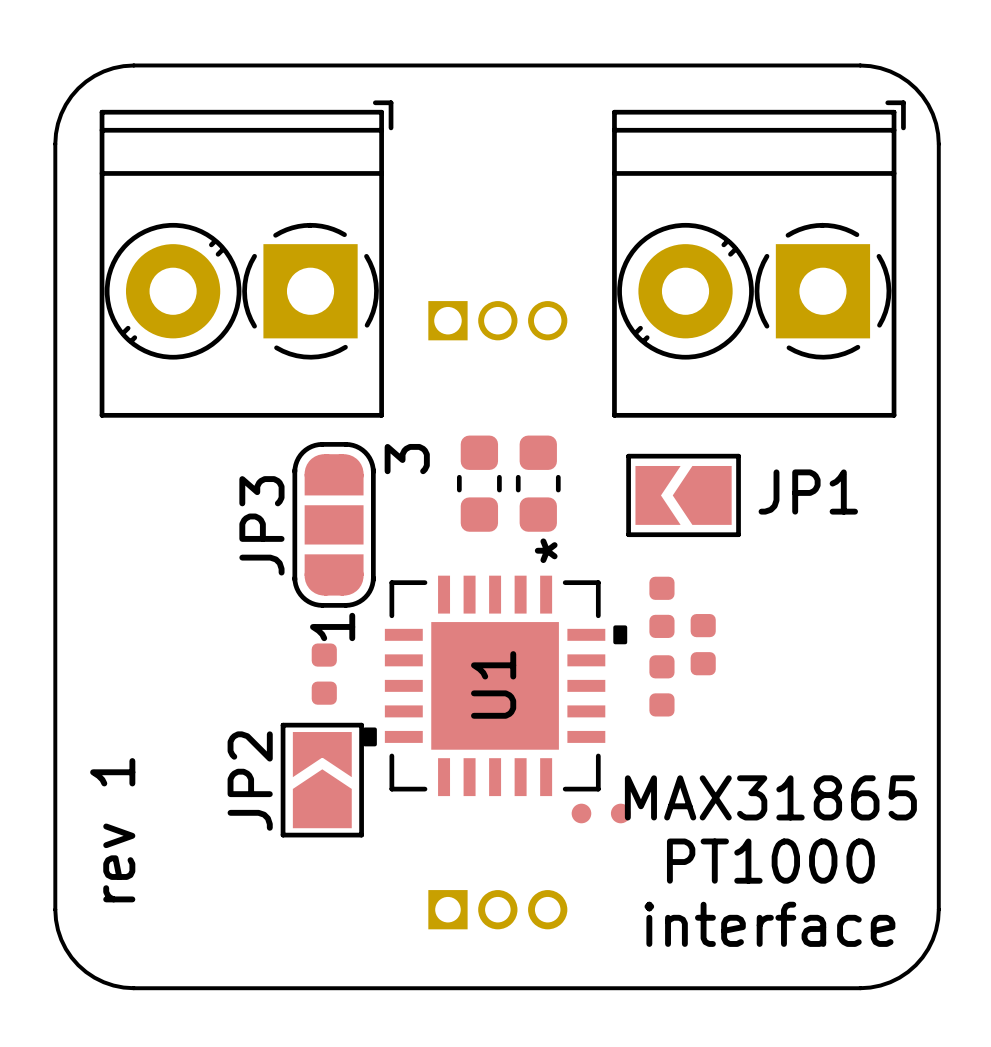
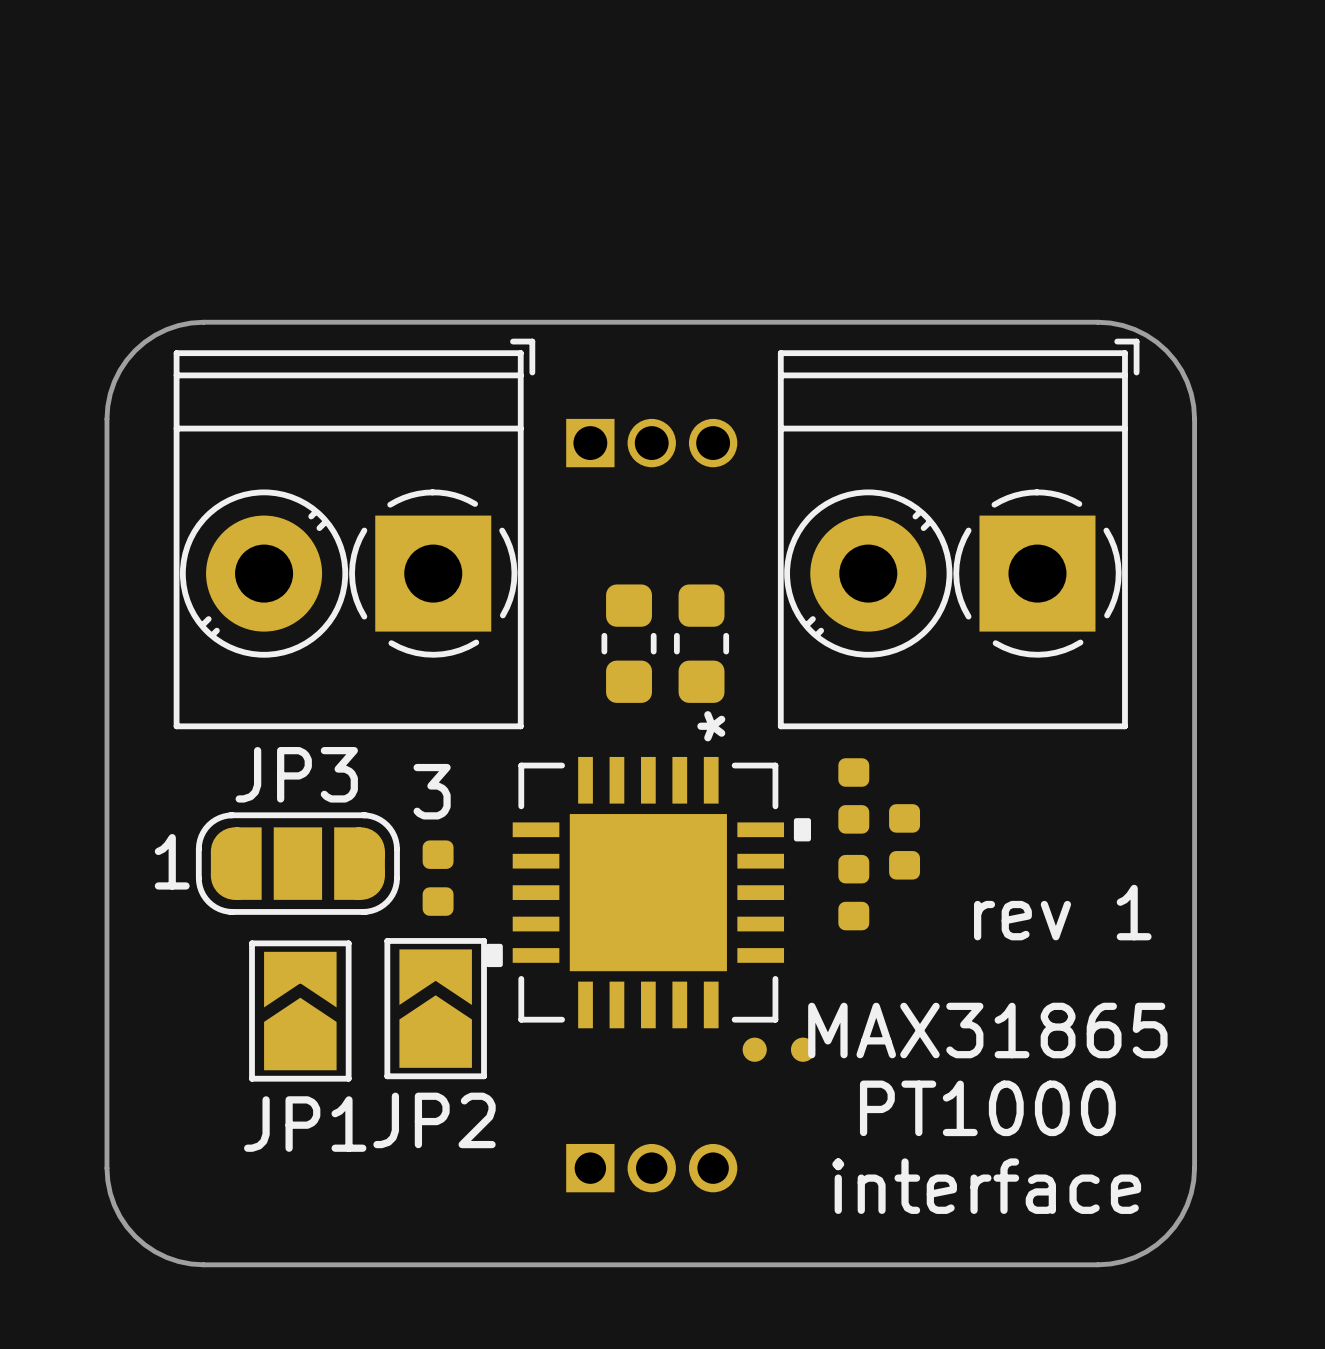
part position: (246, 259) -> (354, 533)
part position: (758, 259) -> (958, 533)
board edge: (55, 301) (55, 144) (57, 123) (71, 96) (86, 81) (113, 68) (133, 65) (860, 65) (880, 68) (899, 76) (915, 88) (928, 104) (936, 123) (938, 144) (938, 301) -> (106, 418) (107, 406) (114, 381) (126, 360) (135, 350) (155, 335) (166, 329) (178, 325) (203, 322) (1110, 323) (1122, 325) (1146, 335) (1166, 350) (1174, 360) (1187, 381) (1193, 406) (1194, 418)
JP3 footprint: [292, 442, 376, 608] -> [195, 812, 400, 915]
JP1 rotation: 0° (683, 495) -> 90° clockwise (300, 1011)
JP1 position: (683, 495) -> (300, 1011)
JP3 name position: JP3 (261, 525) -> JP3 (296, 774)
U1 name: U1 (493, 684) -> none
JP2 name rotation: 0° (250, 781) -> 90° clockwise (434, 1120)
text rotation: 0° (112, 830) -> 90° clockwise (1062, 912)
text position: rev 1 (112, 830) -> rev 1 (1062, 912)

